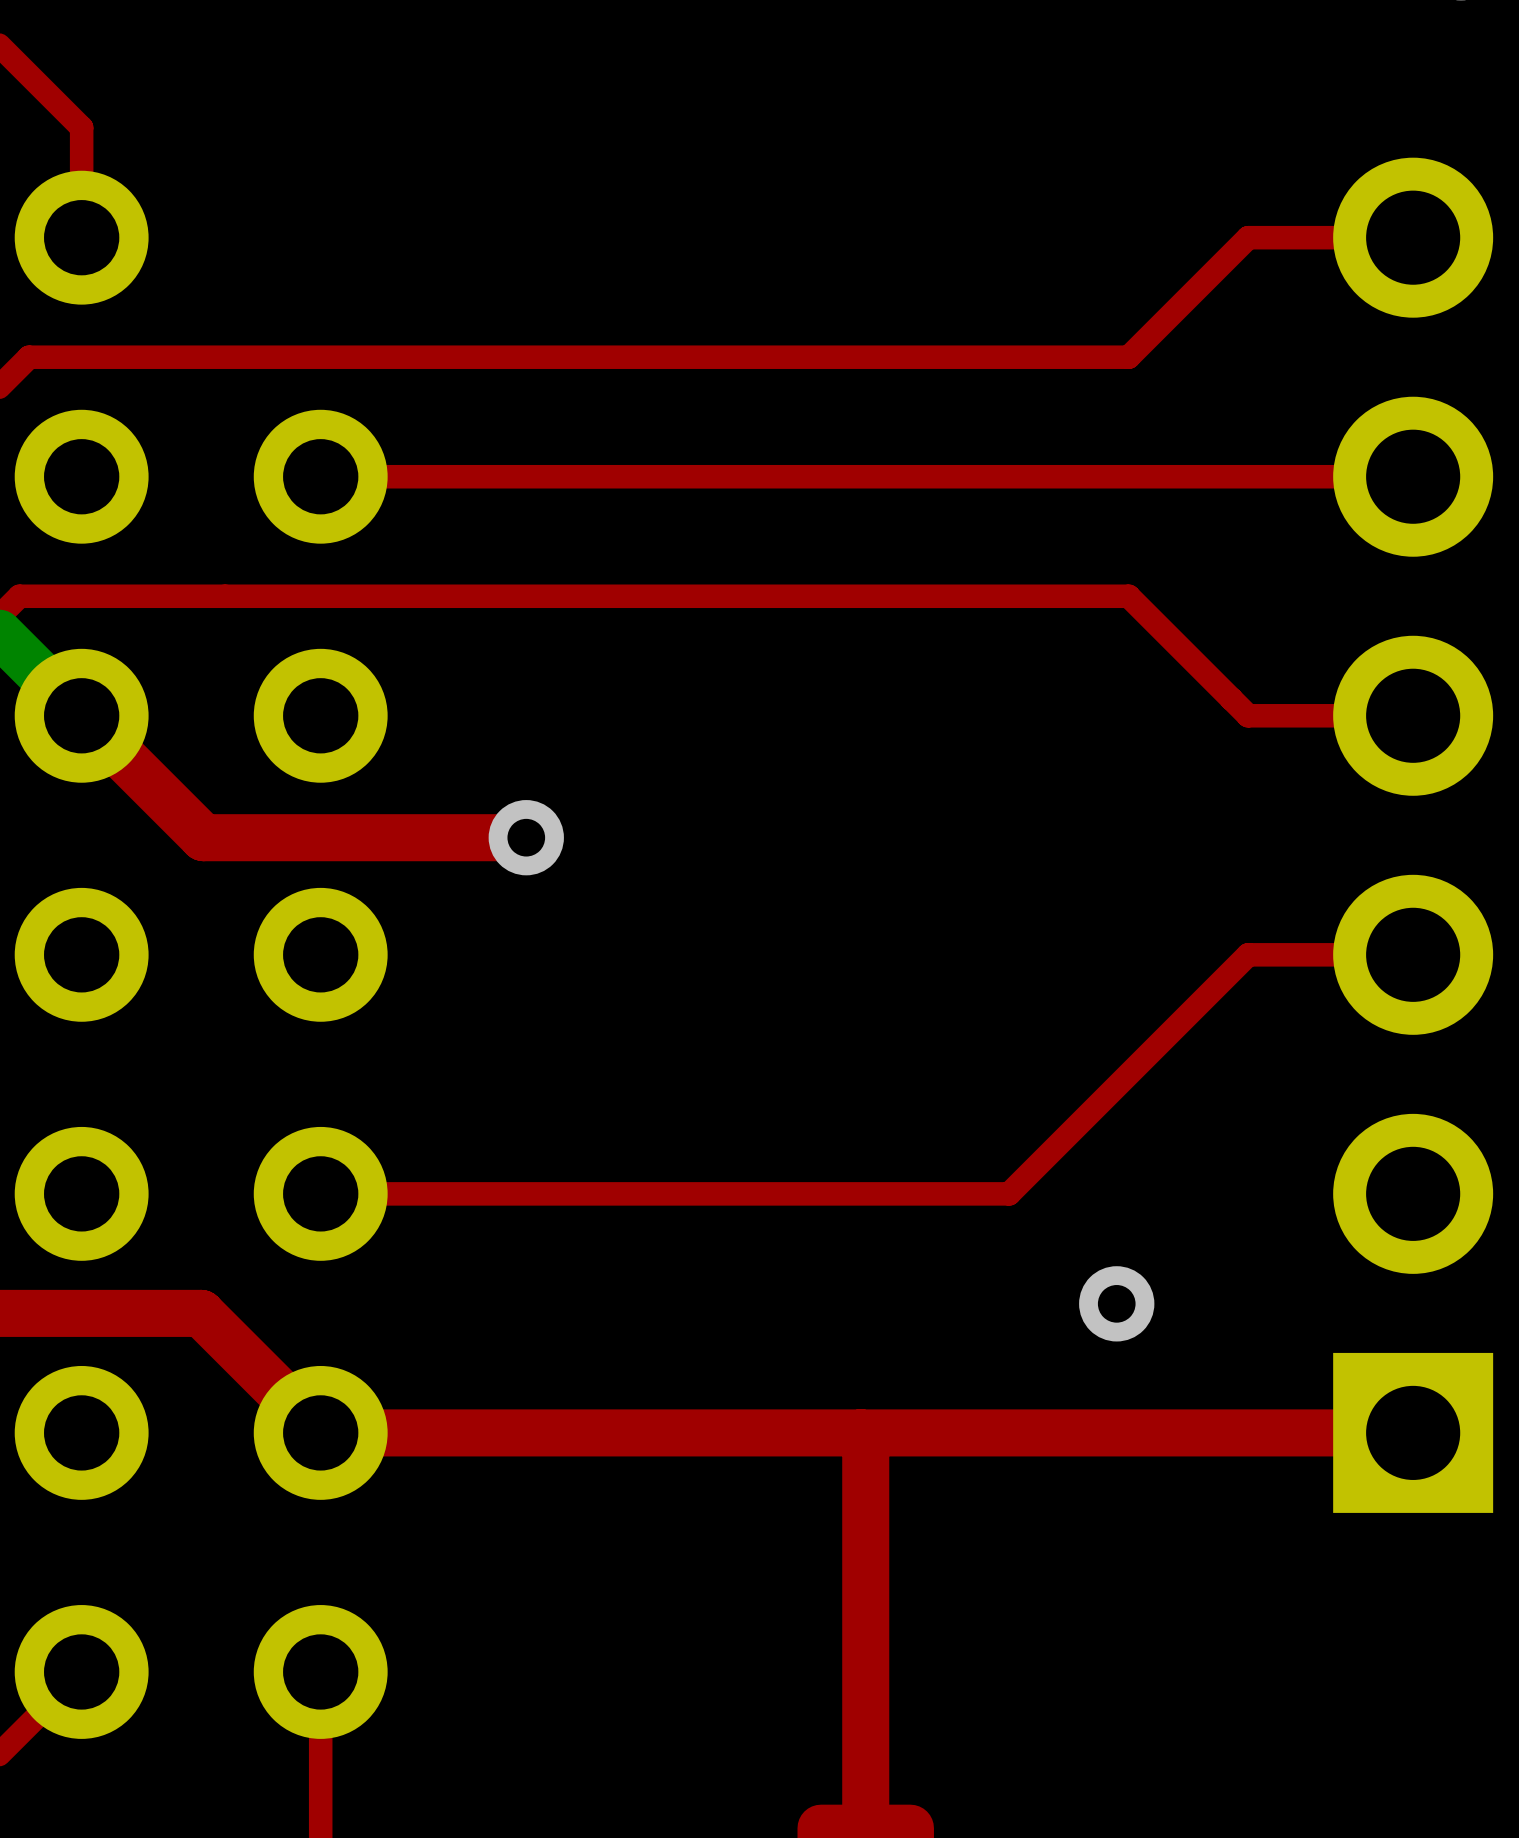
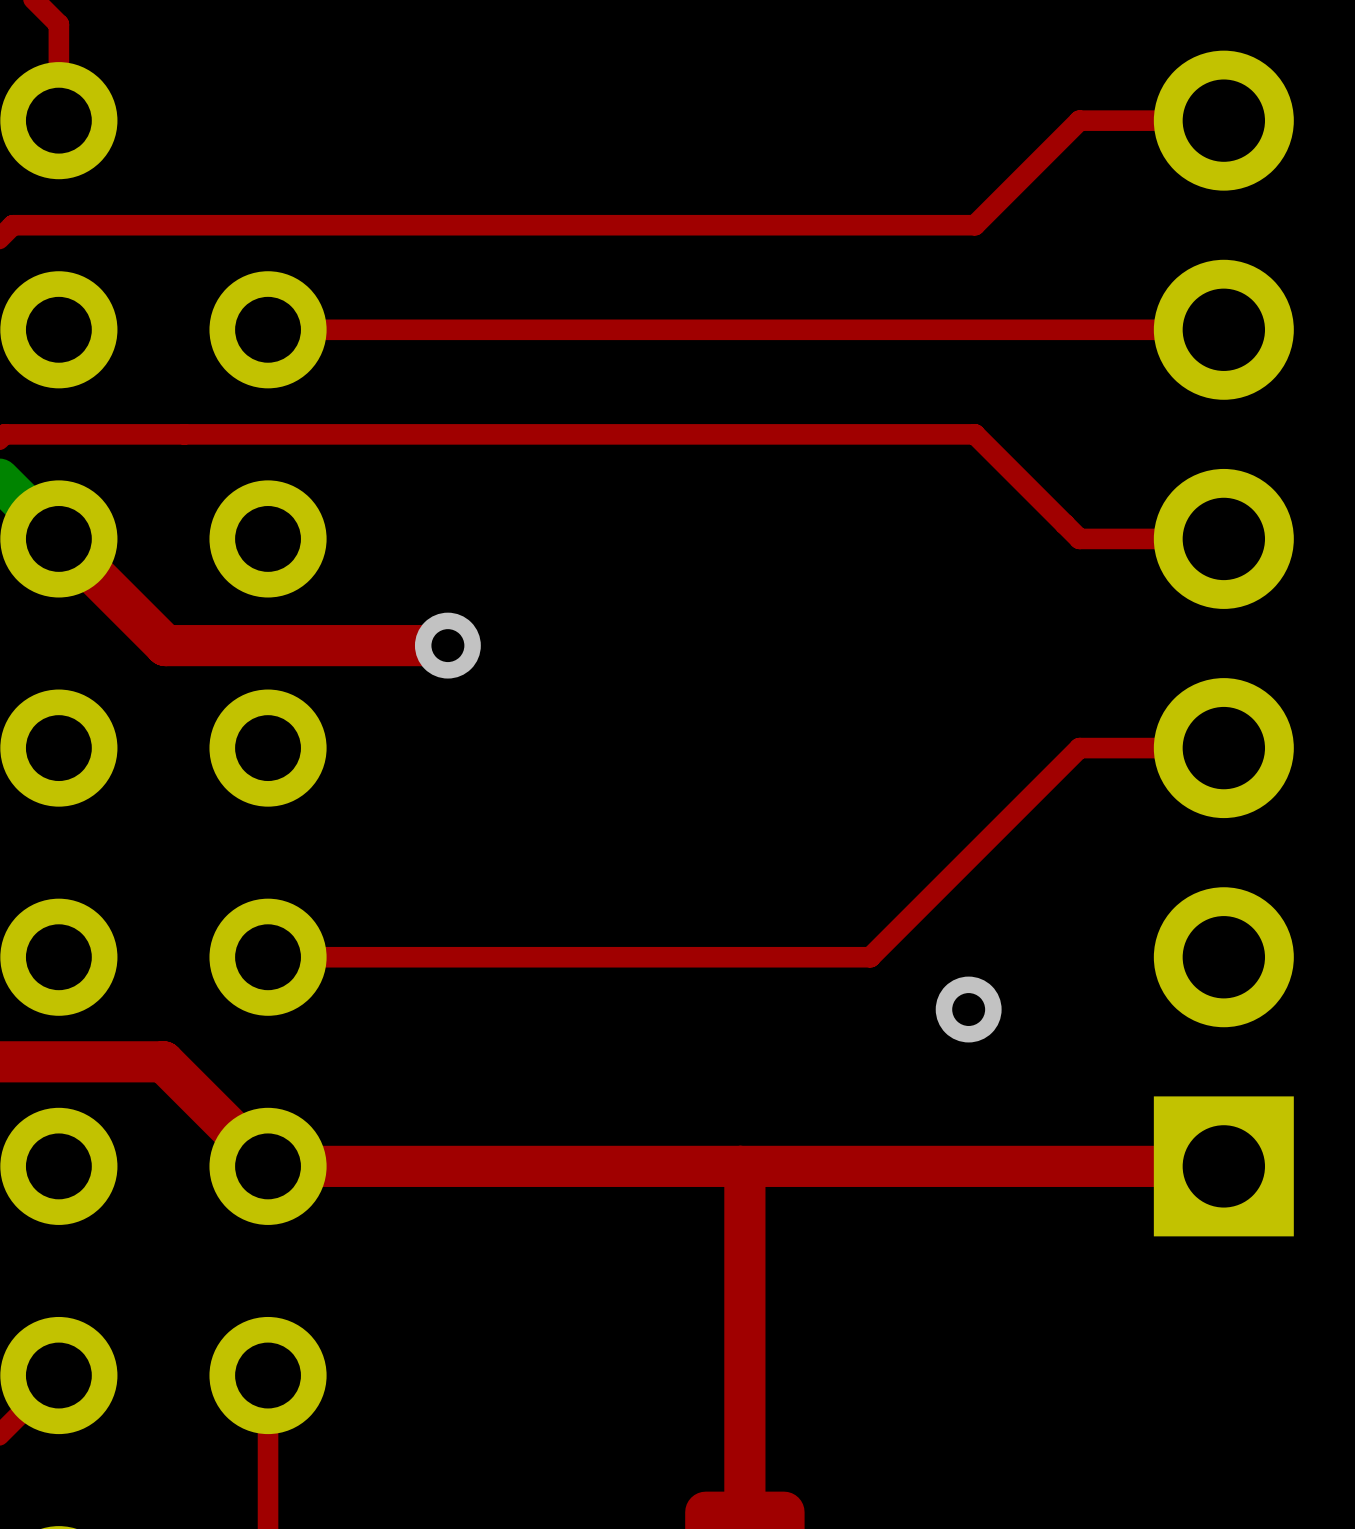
via position: (1116, 1303) -> (968, 1009)

